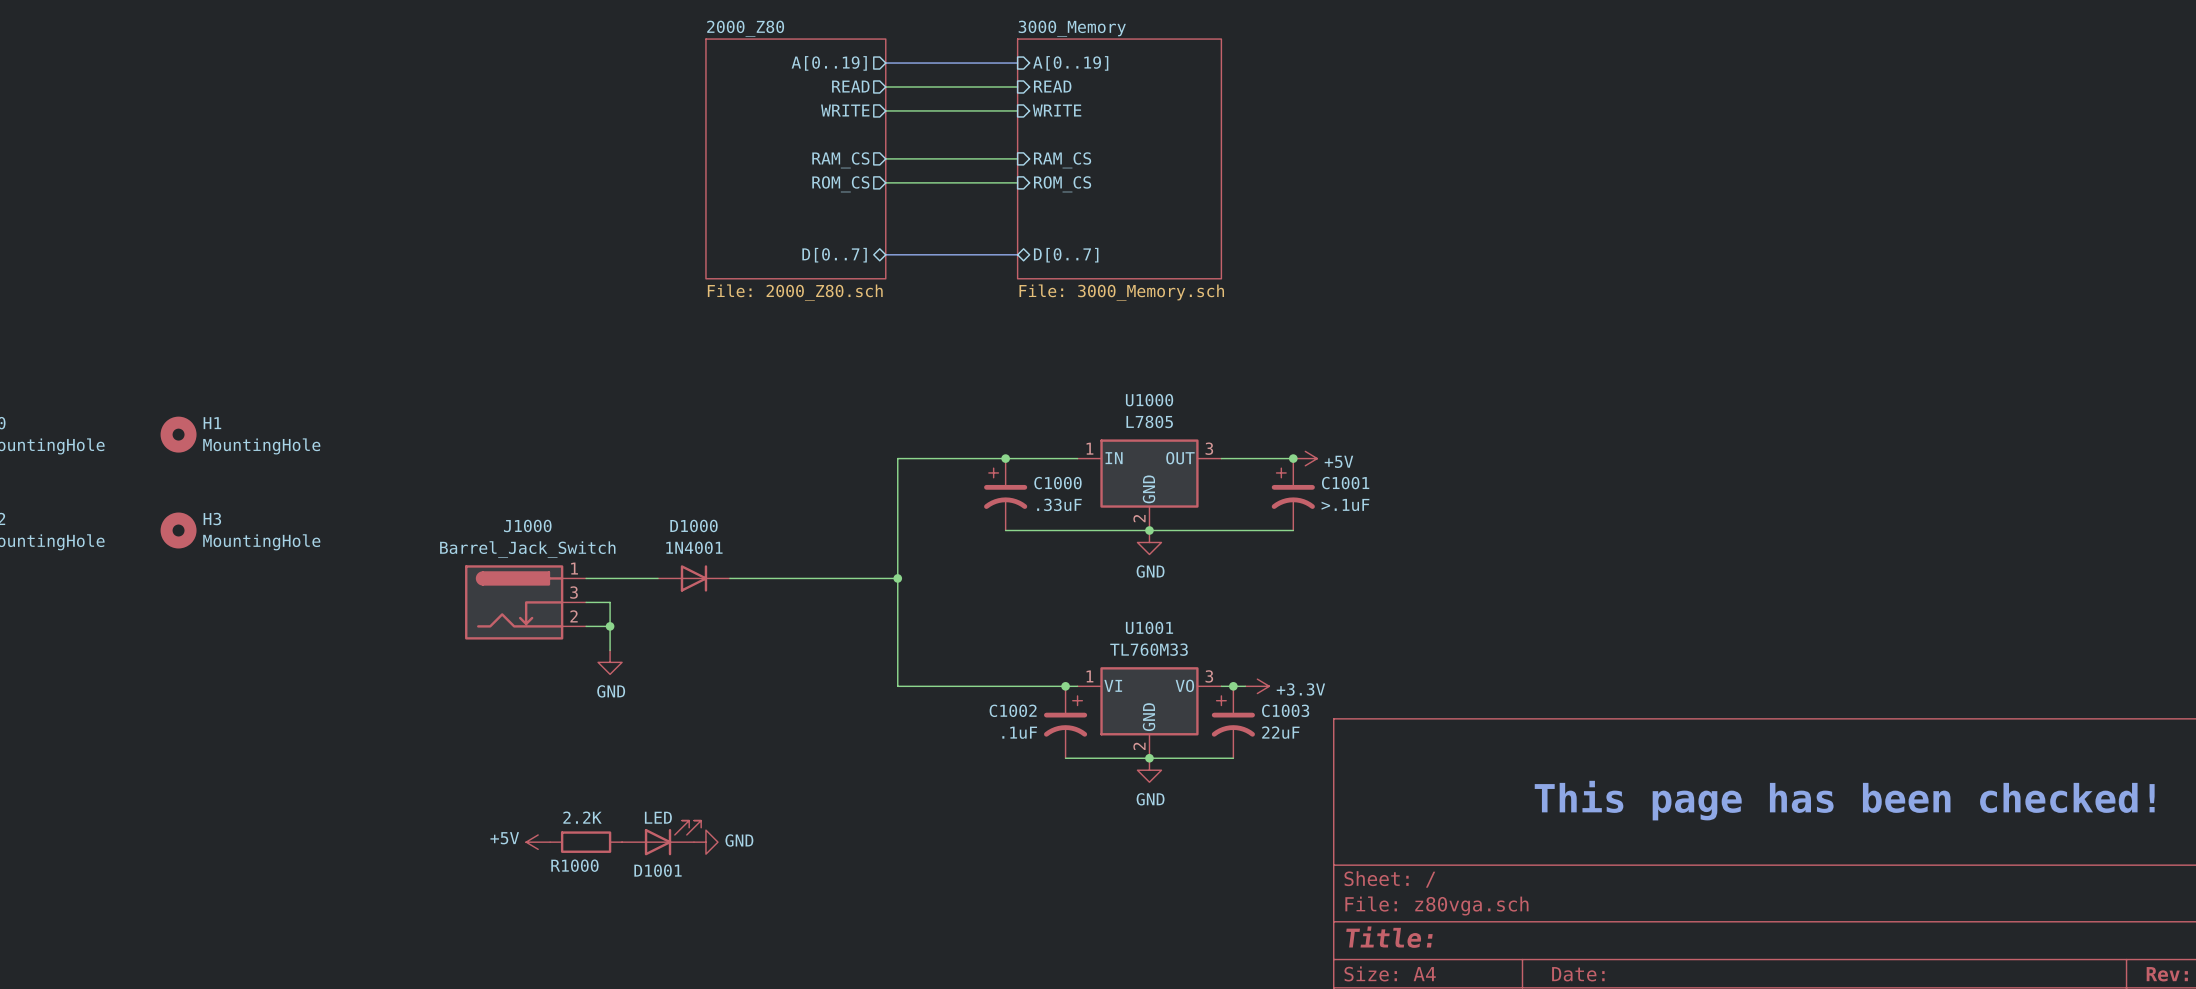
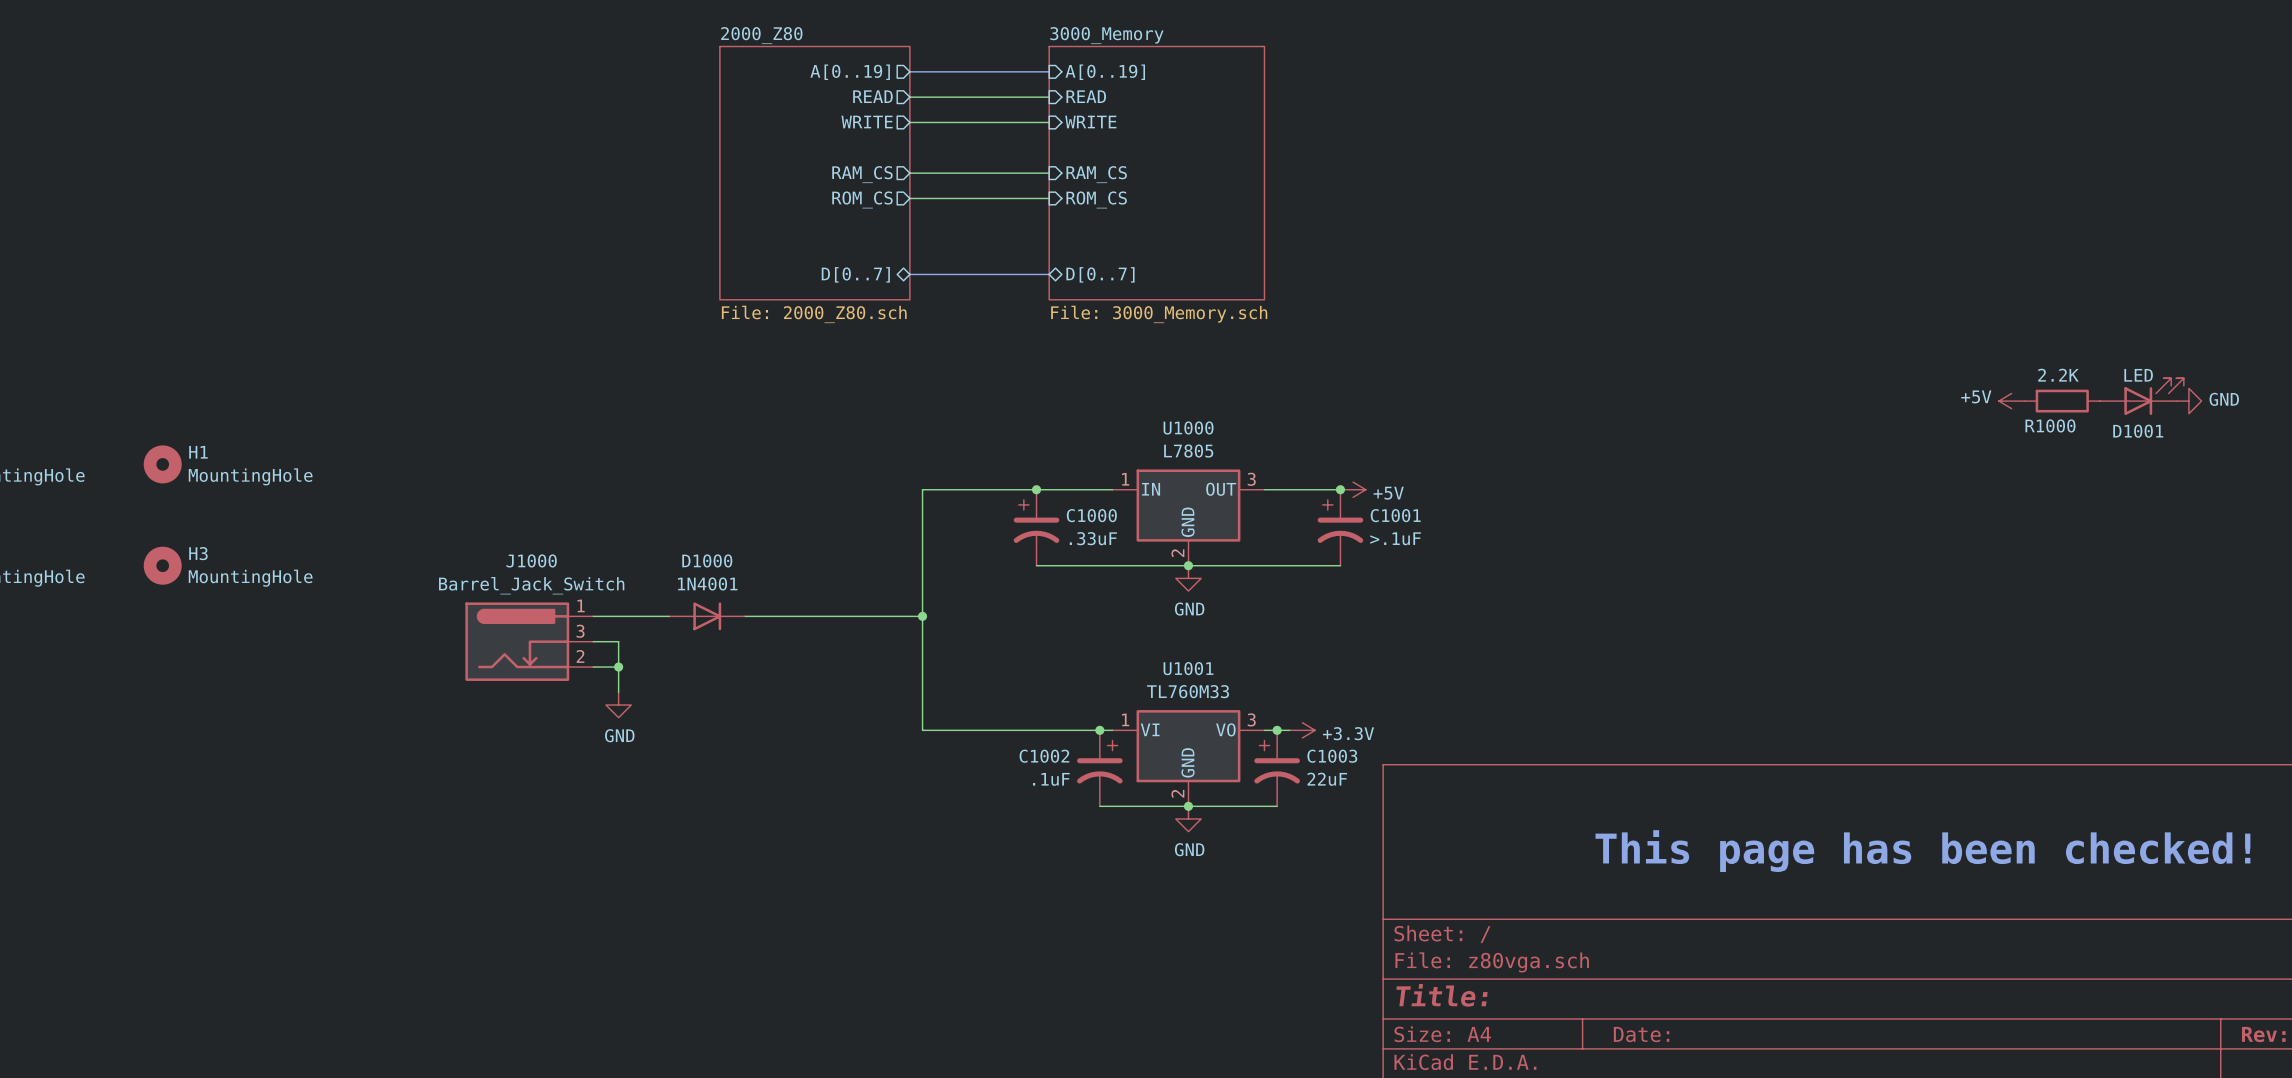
power symbol: none -> +5V (2011, 401)
power symbol: none -> GND (2188, 401)
D1001 position: (661, 837) -> (2142, 396)
power symbol: +5V (538, 842) -> none
R1000 position: (586, 842) -> (2062, 401)
power symbol: GND (705, 842) -> none

